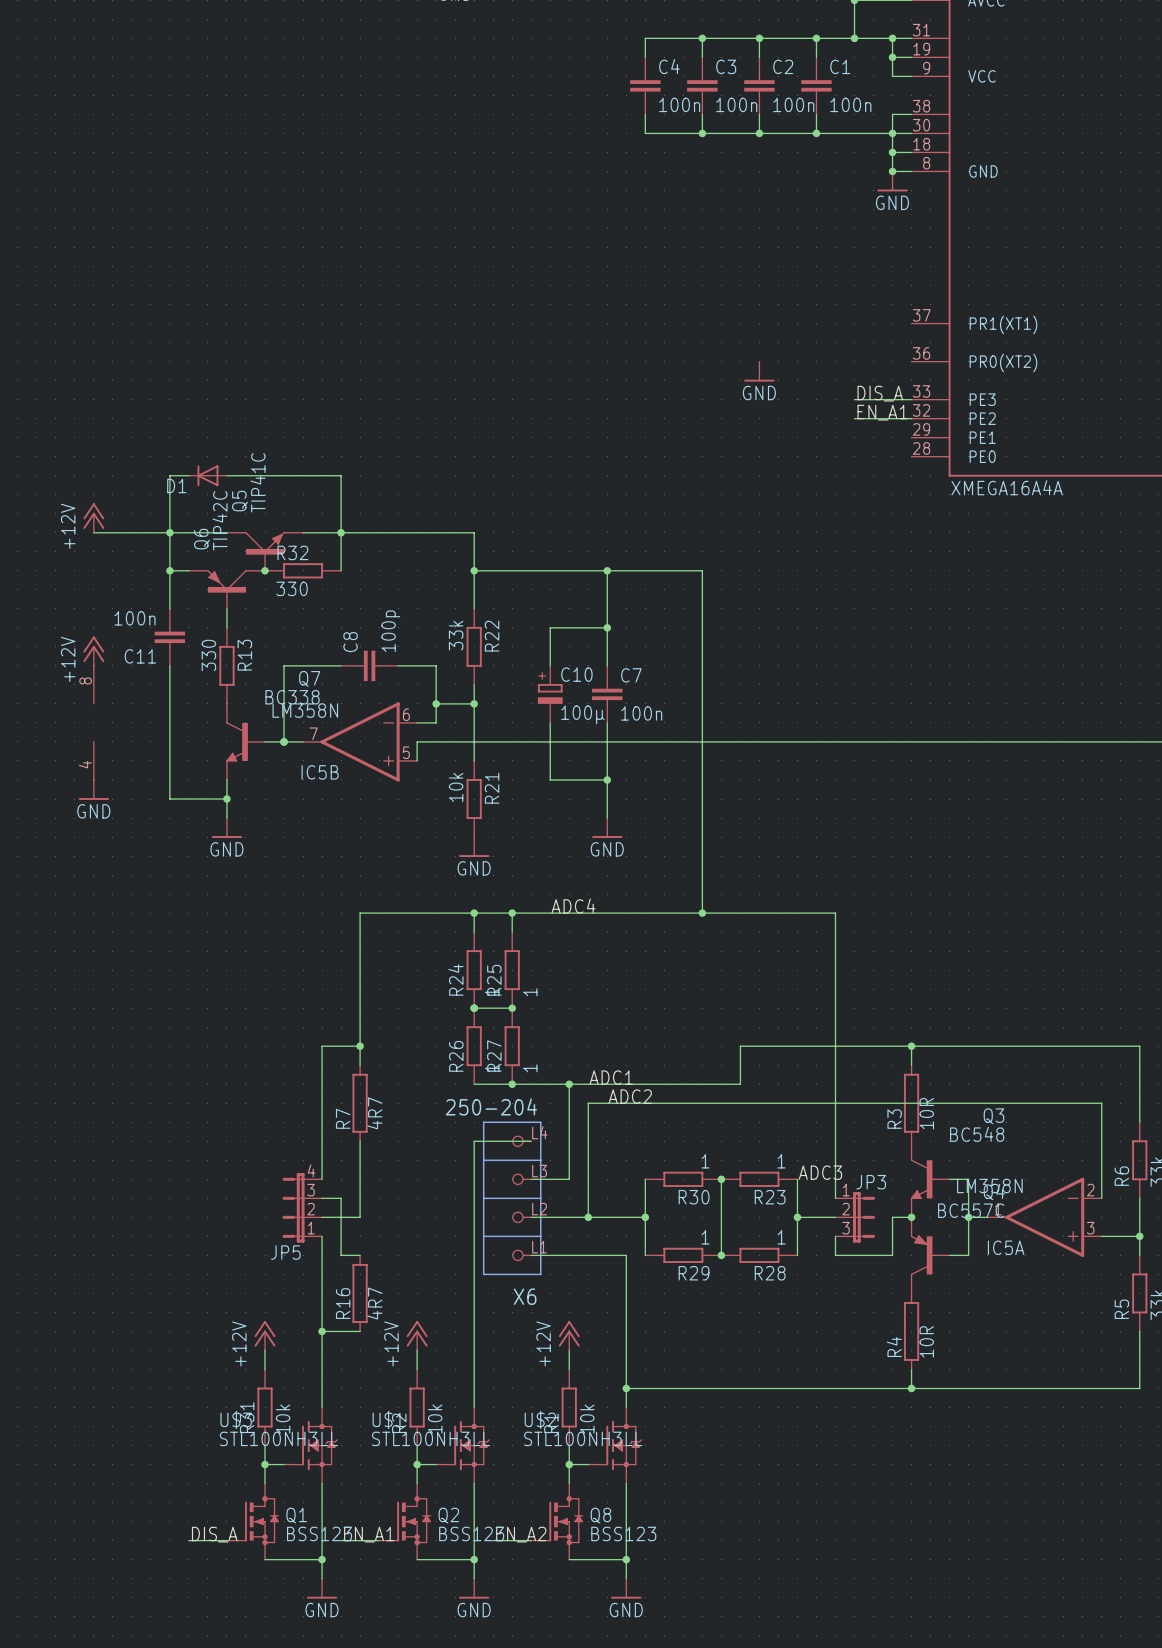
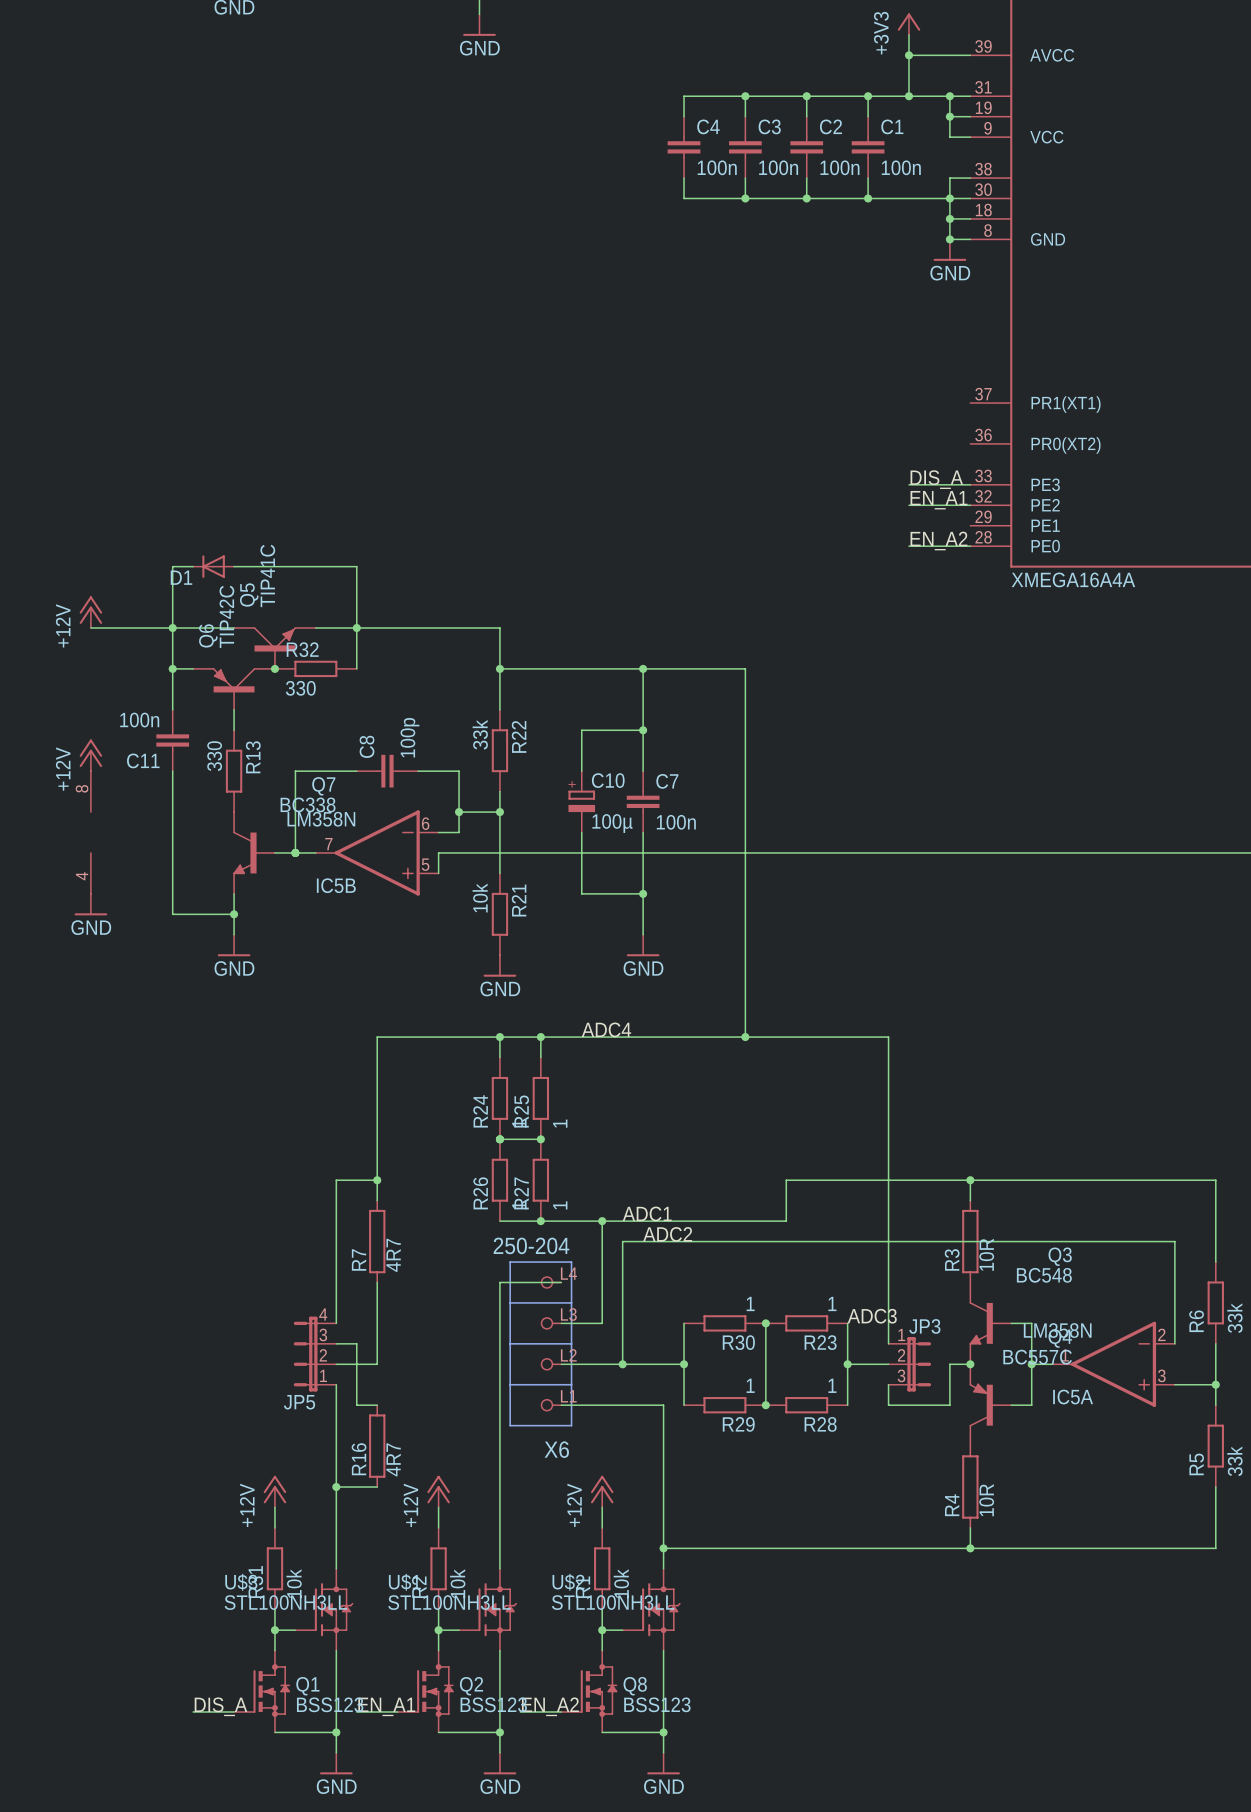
power symbol: GND (759, 371) -> none
label: none -> EN_A2 (938, 540)
wire: none -> (909, 546) (970, 546)

